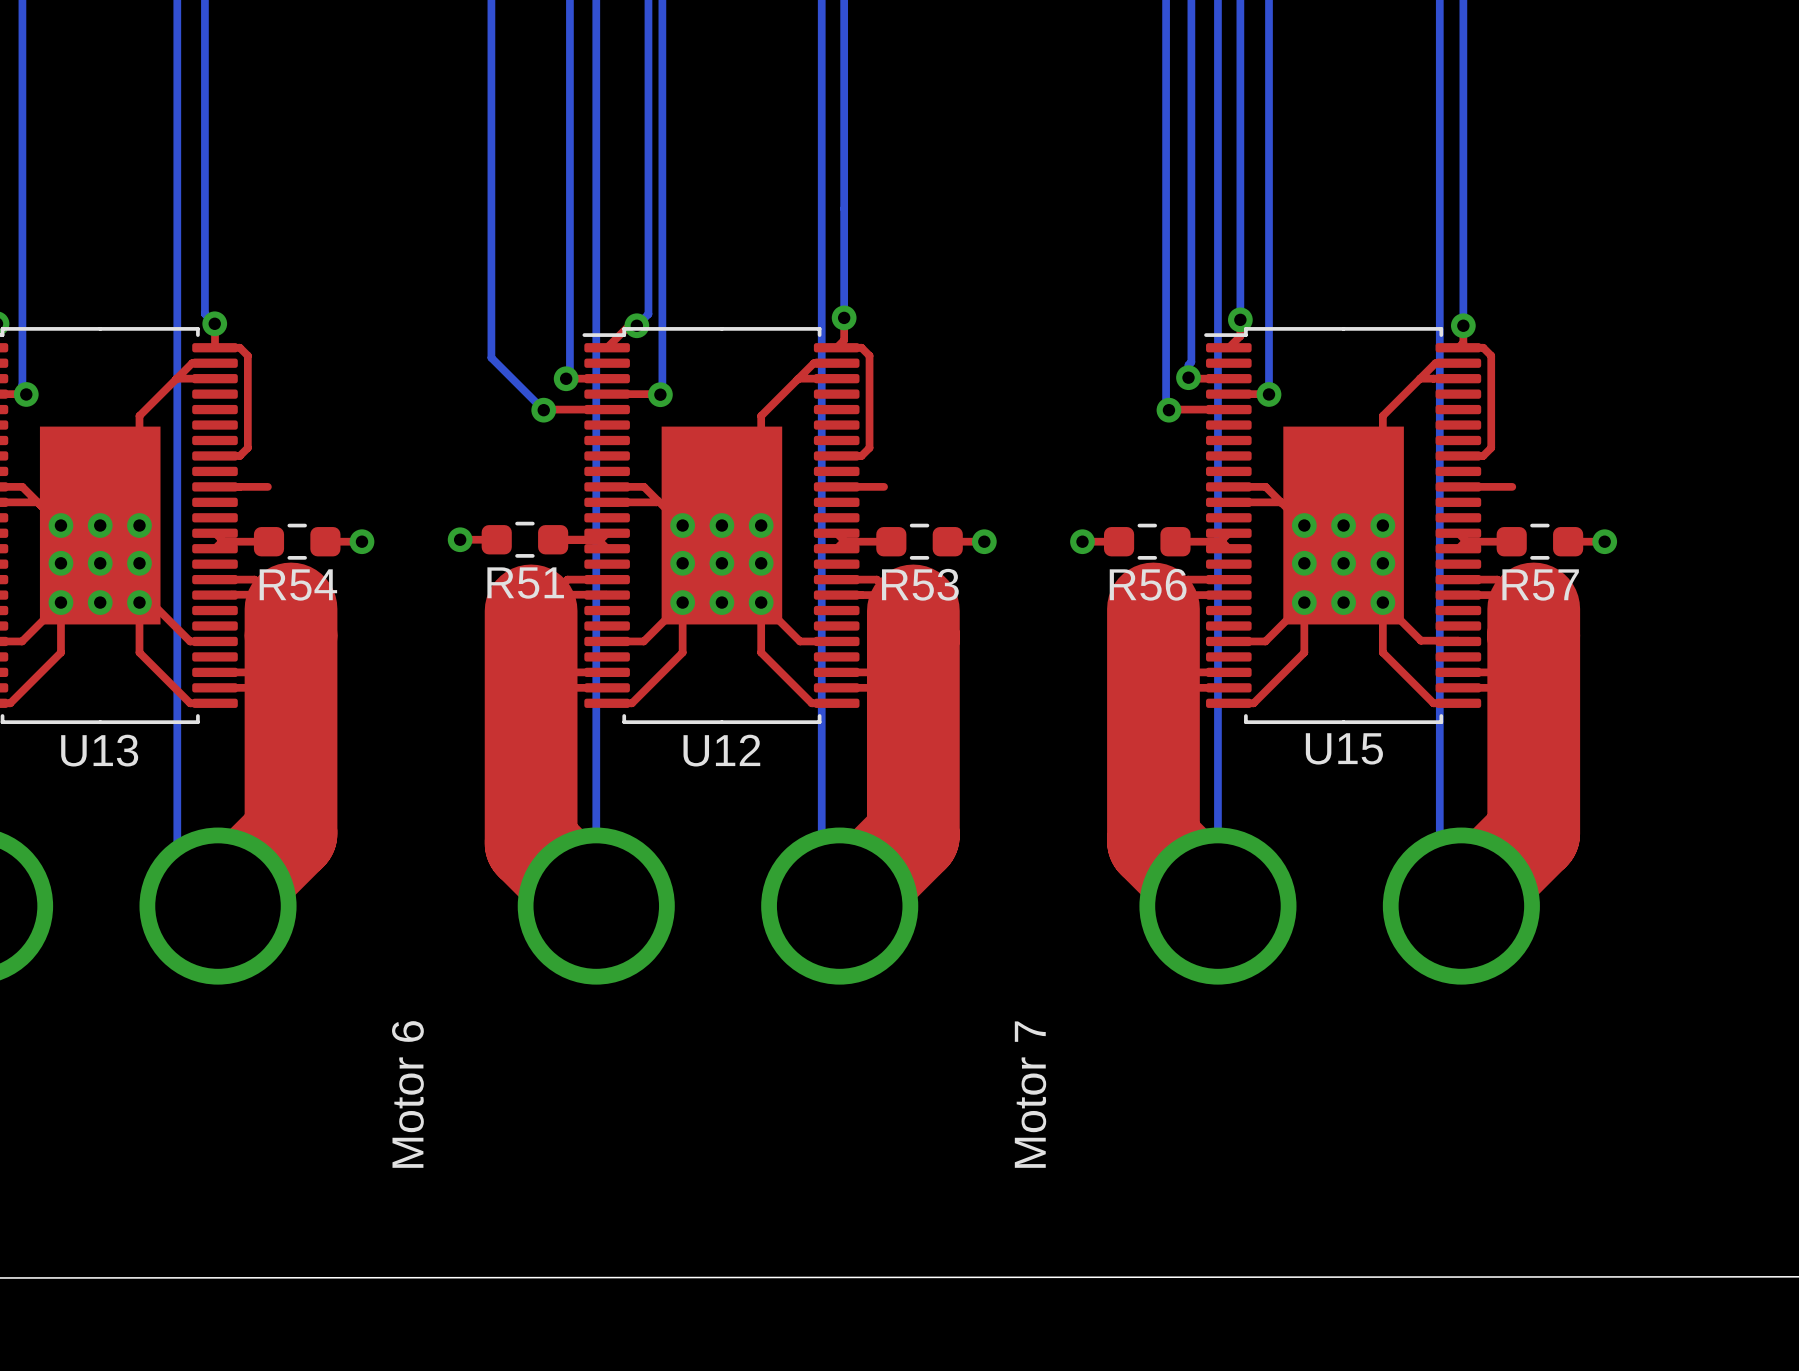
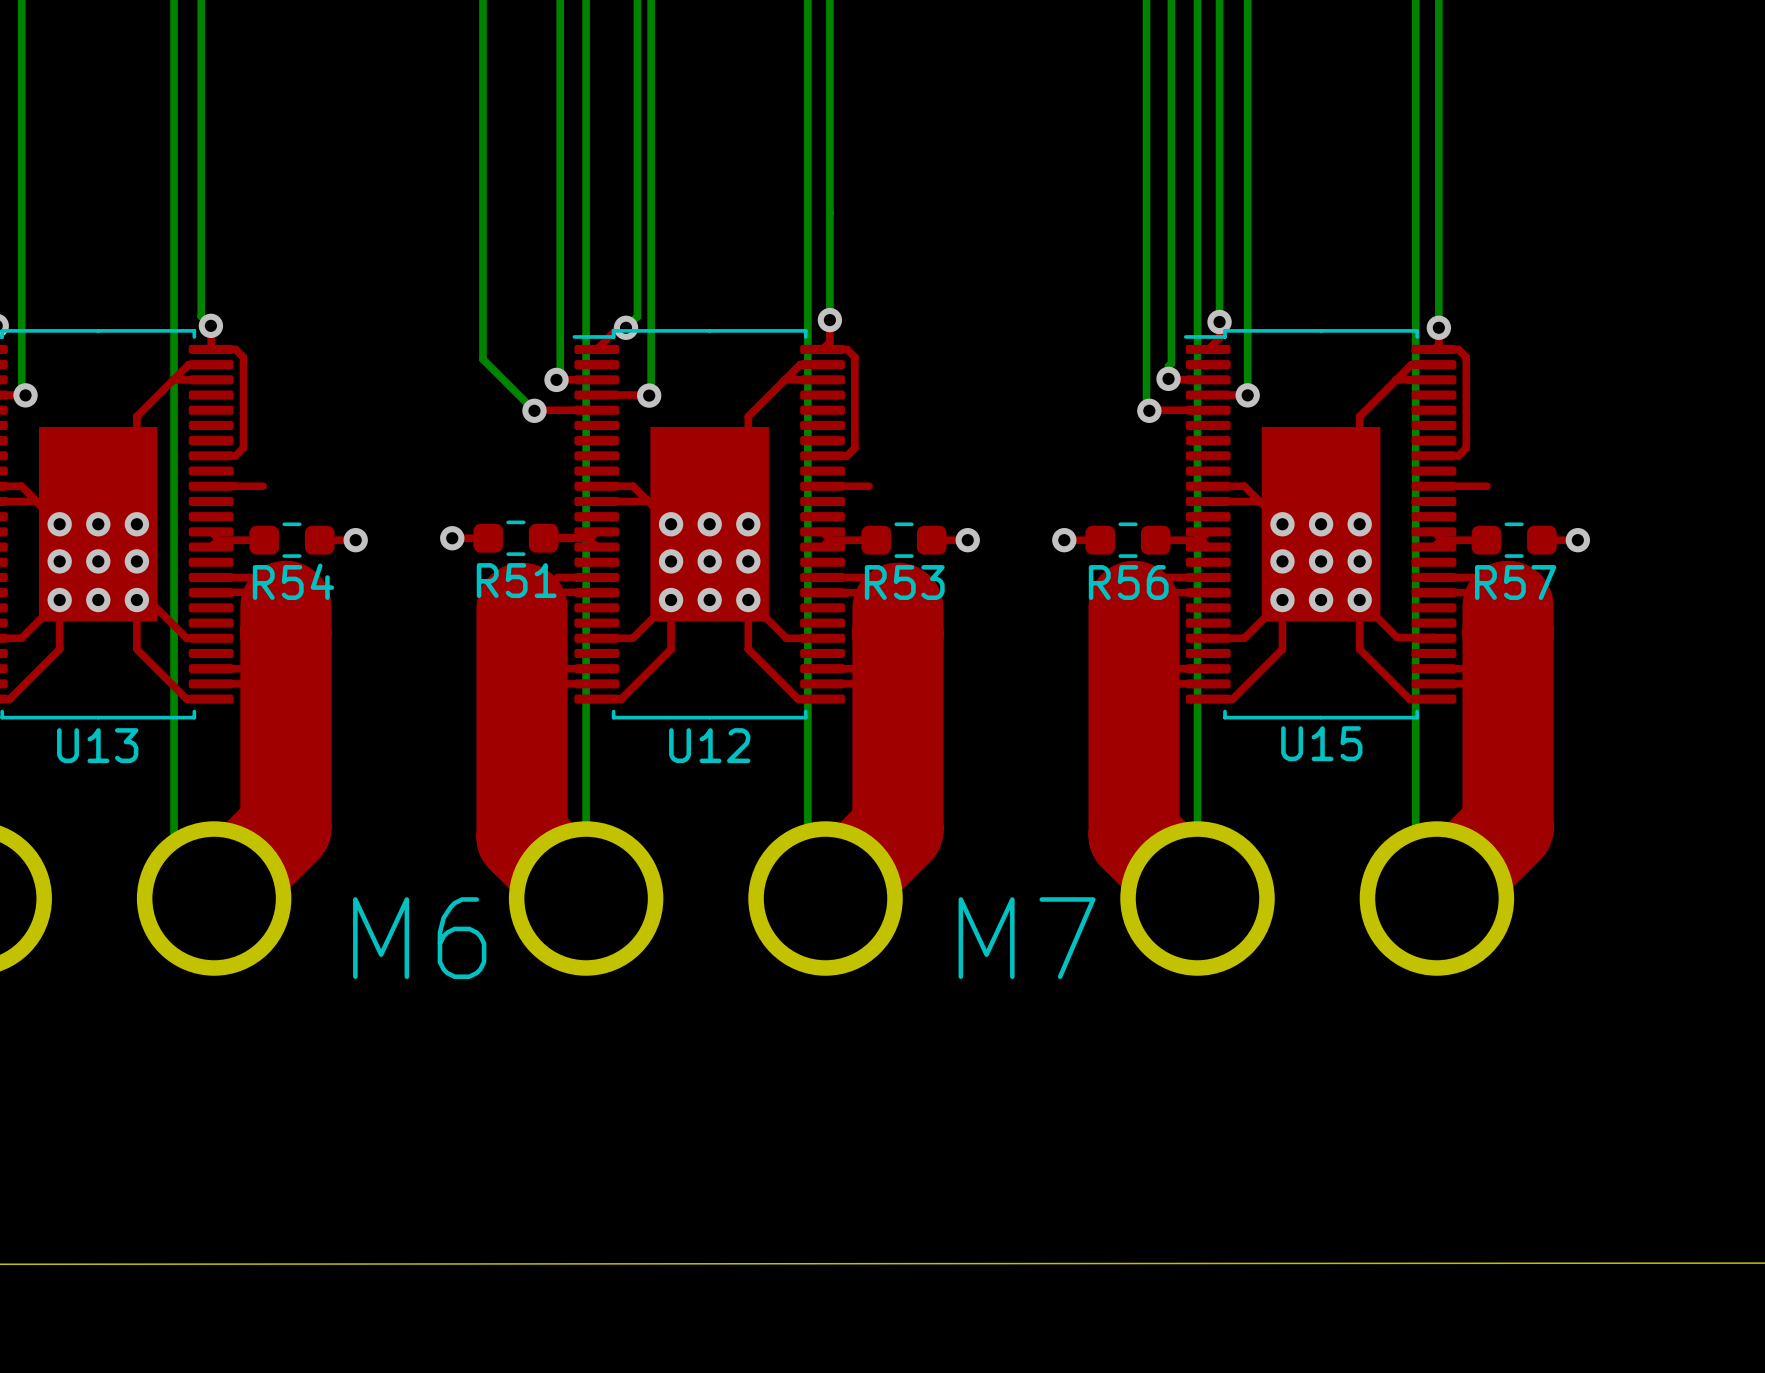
text: none -> M6 (419, 938)
text: none -> M7 (1027, 938)
text: Motor 6 (407, 1094) -> none
text: Motor 7 (1030, 1094) -> none

